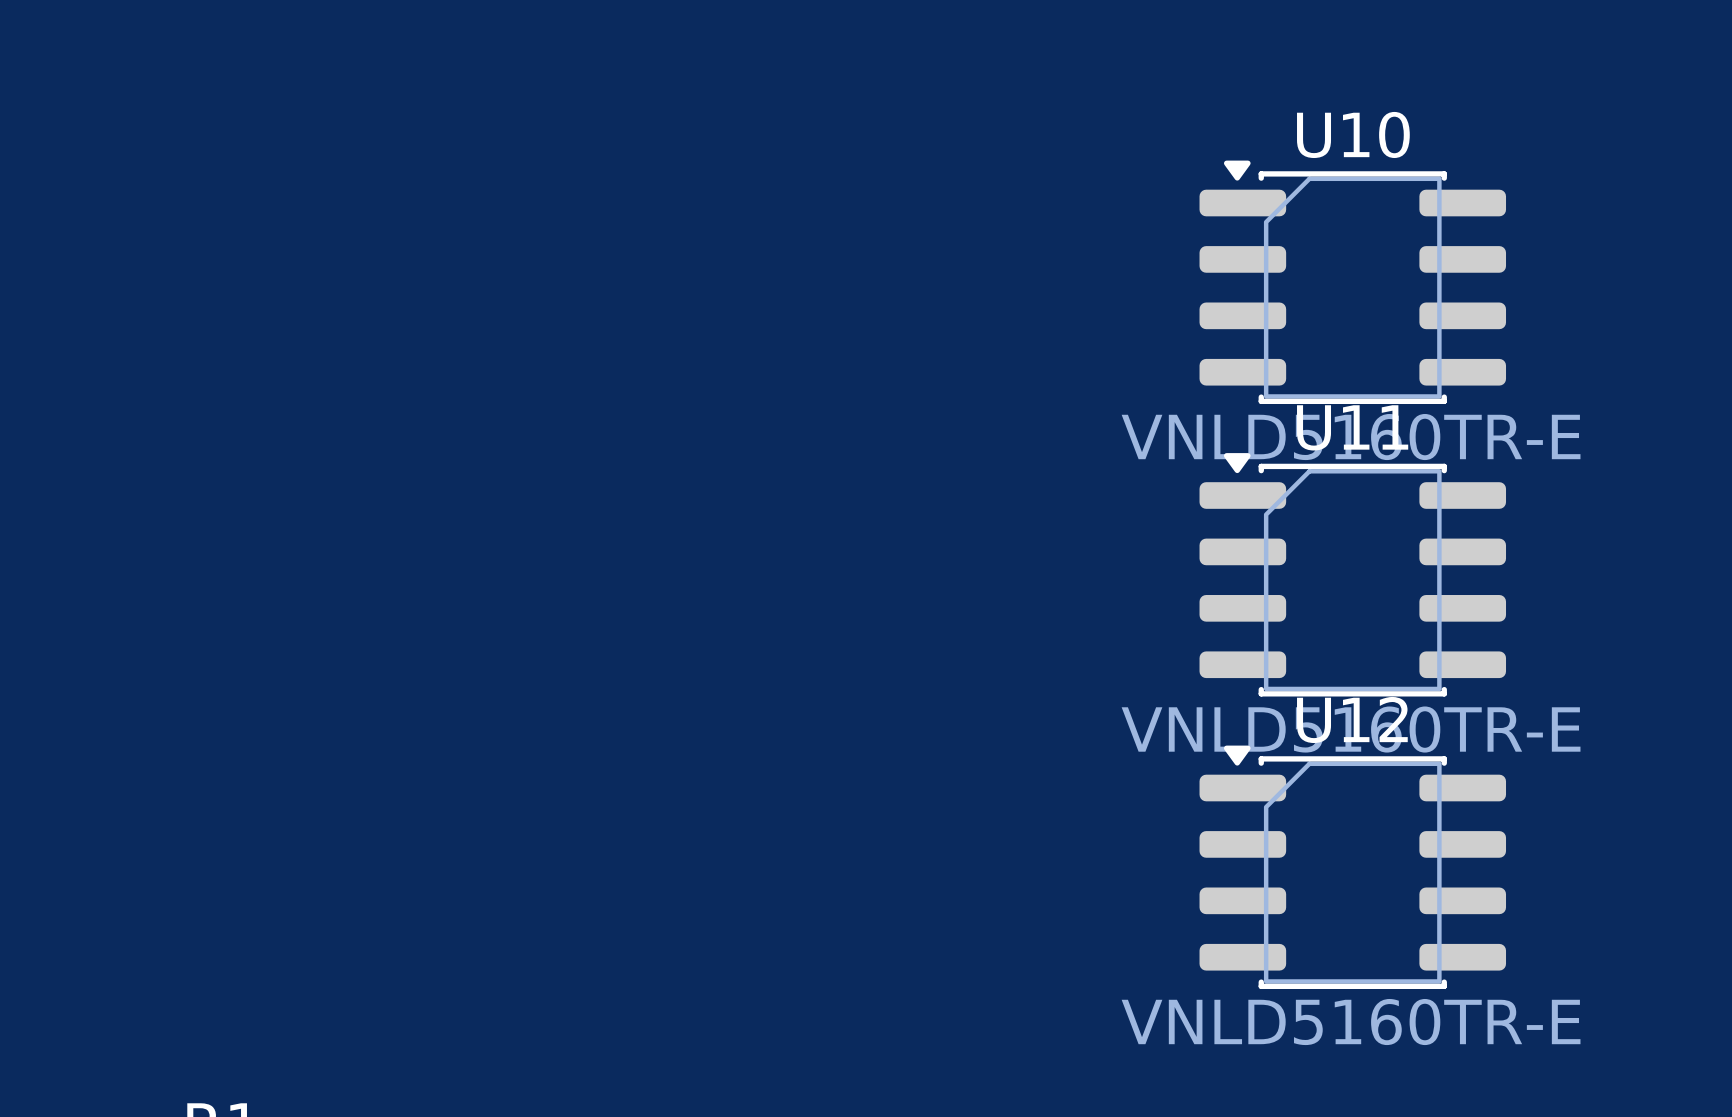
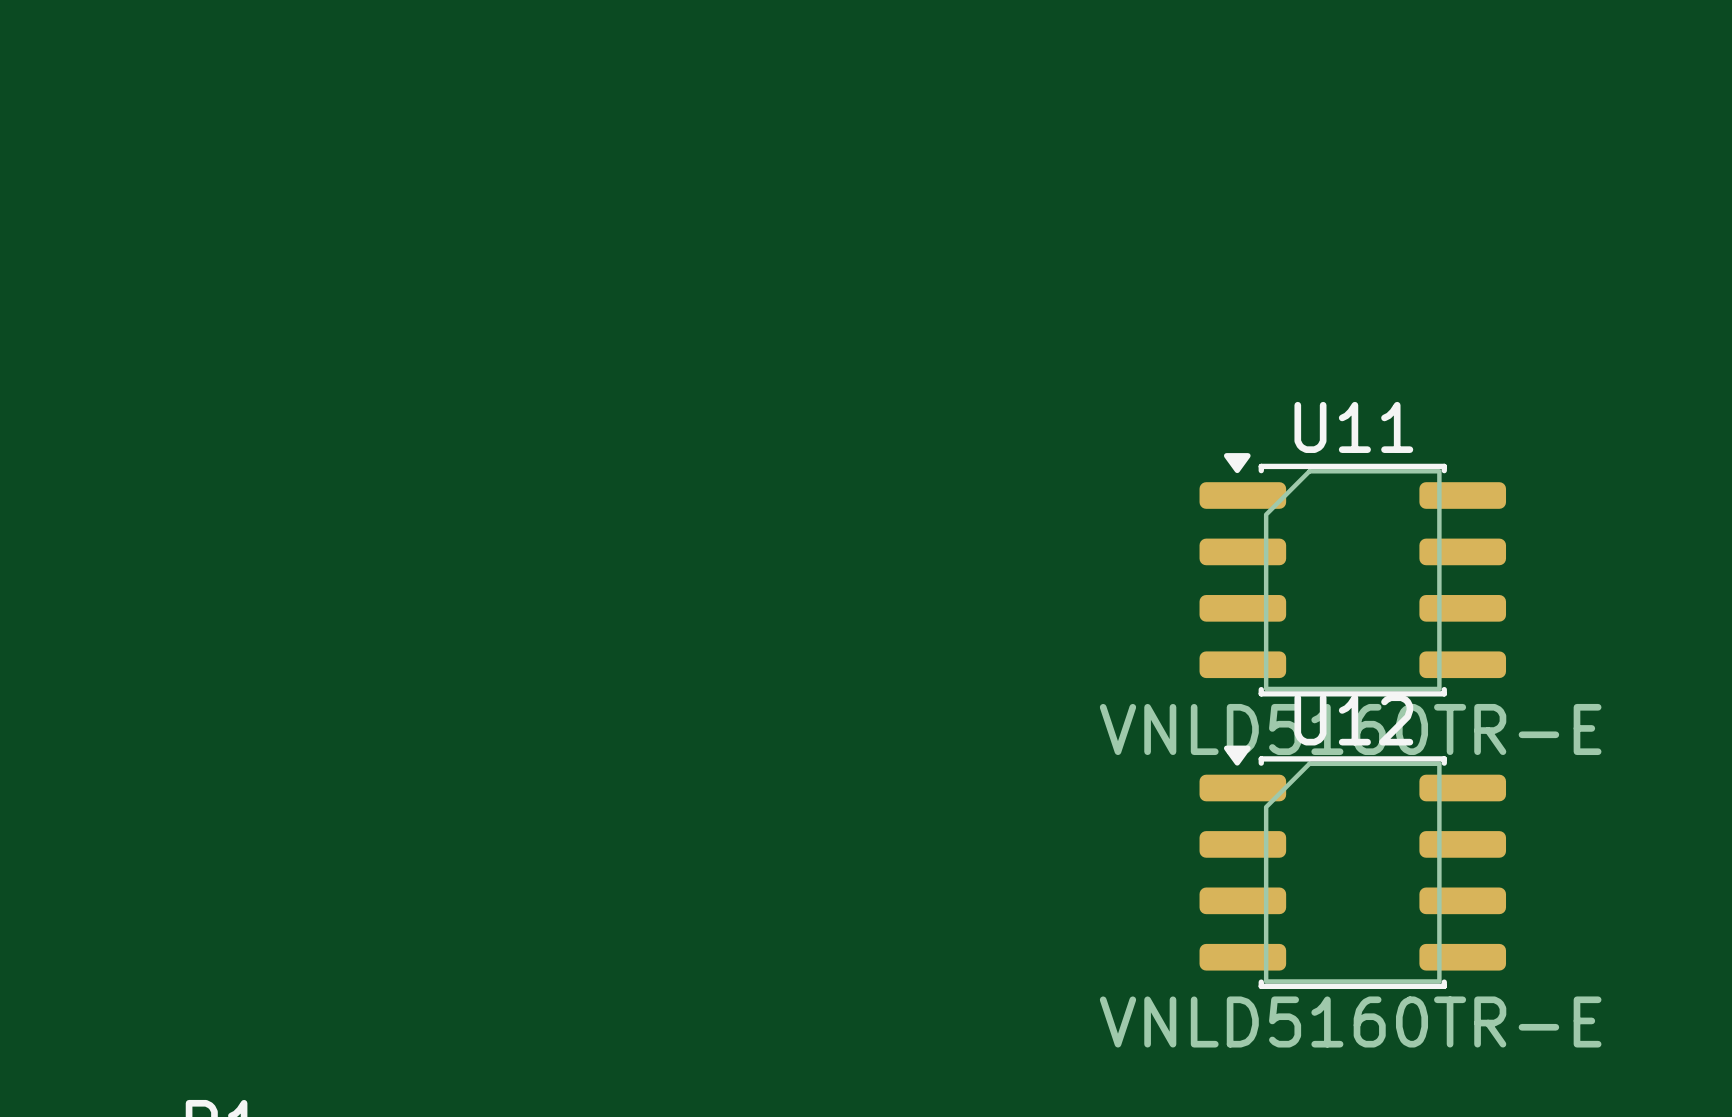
U10: VNLD5160TR-E (1352, 282) -> none

